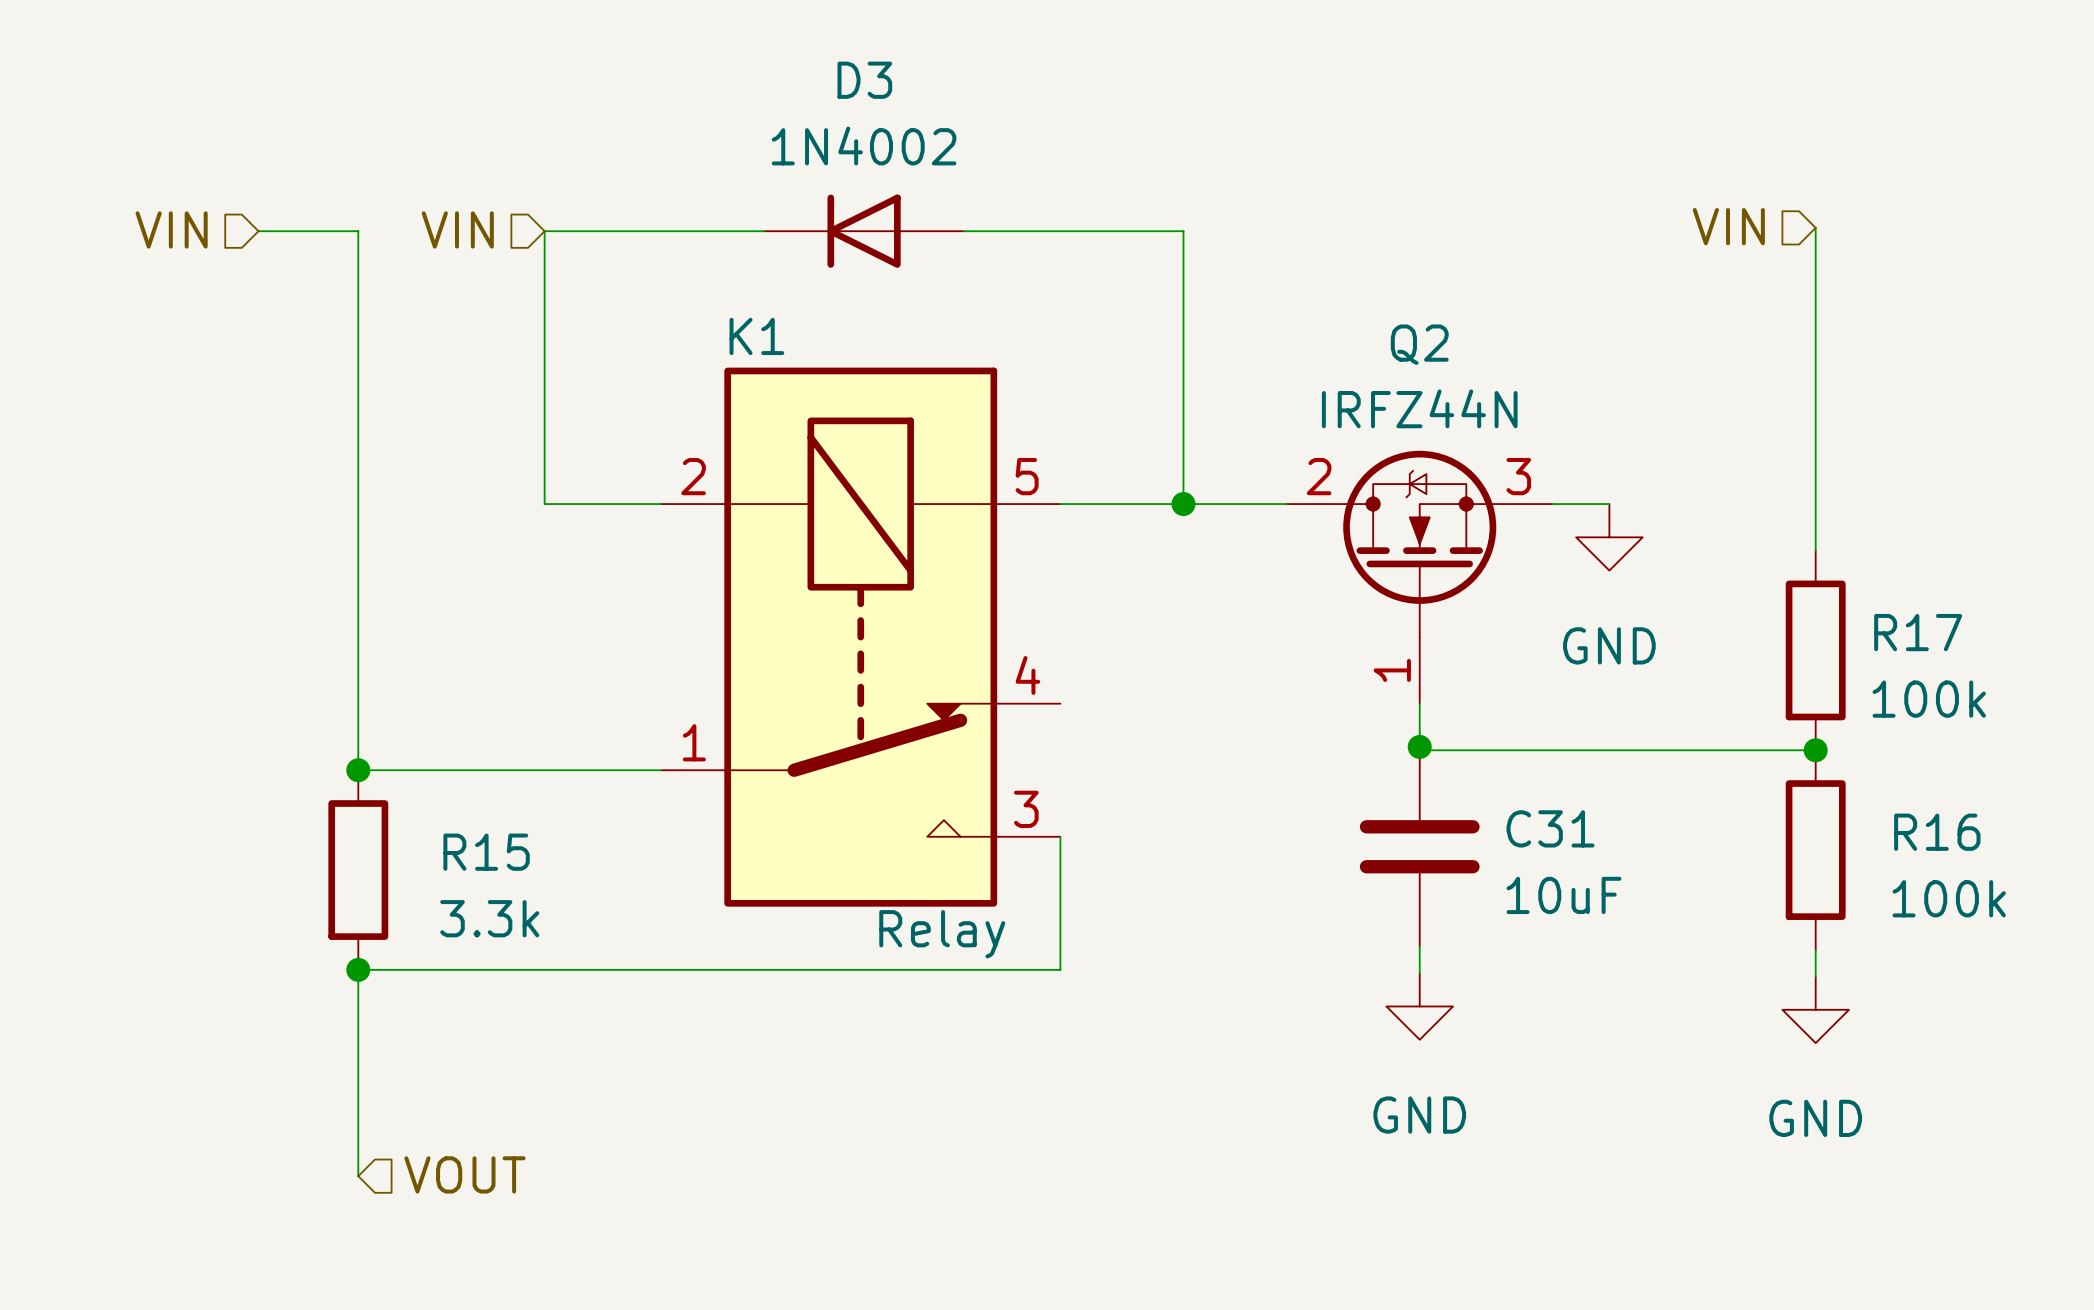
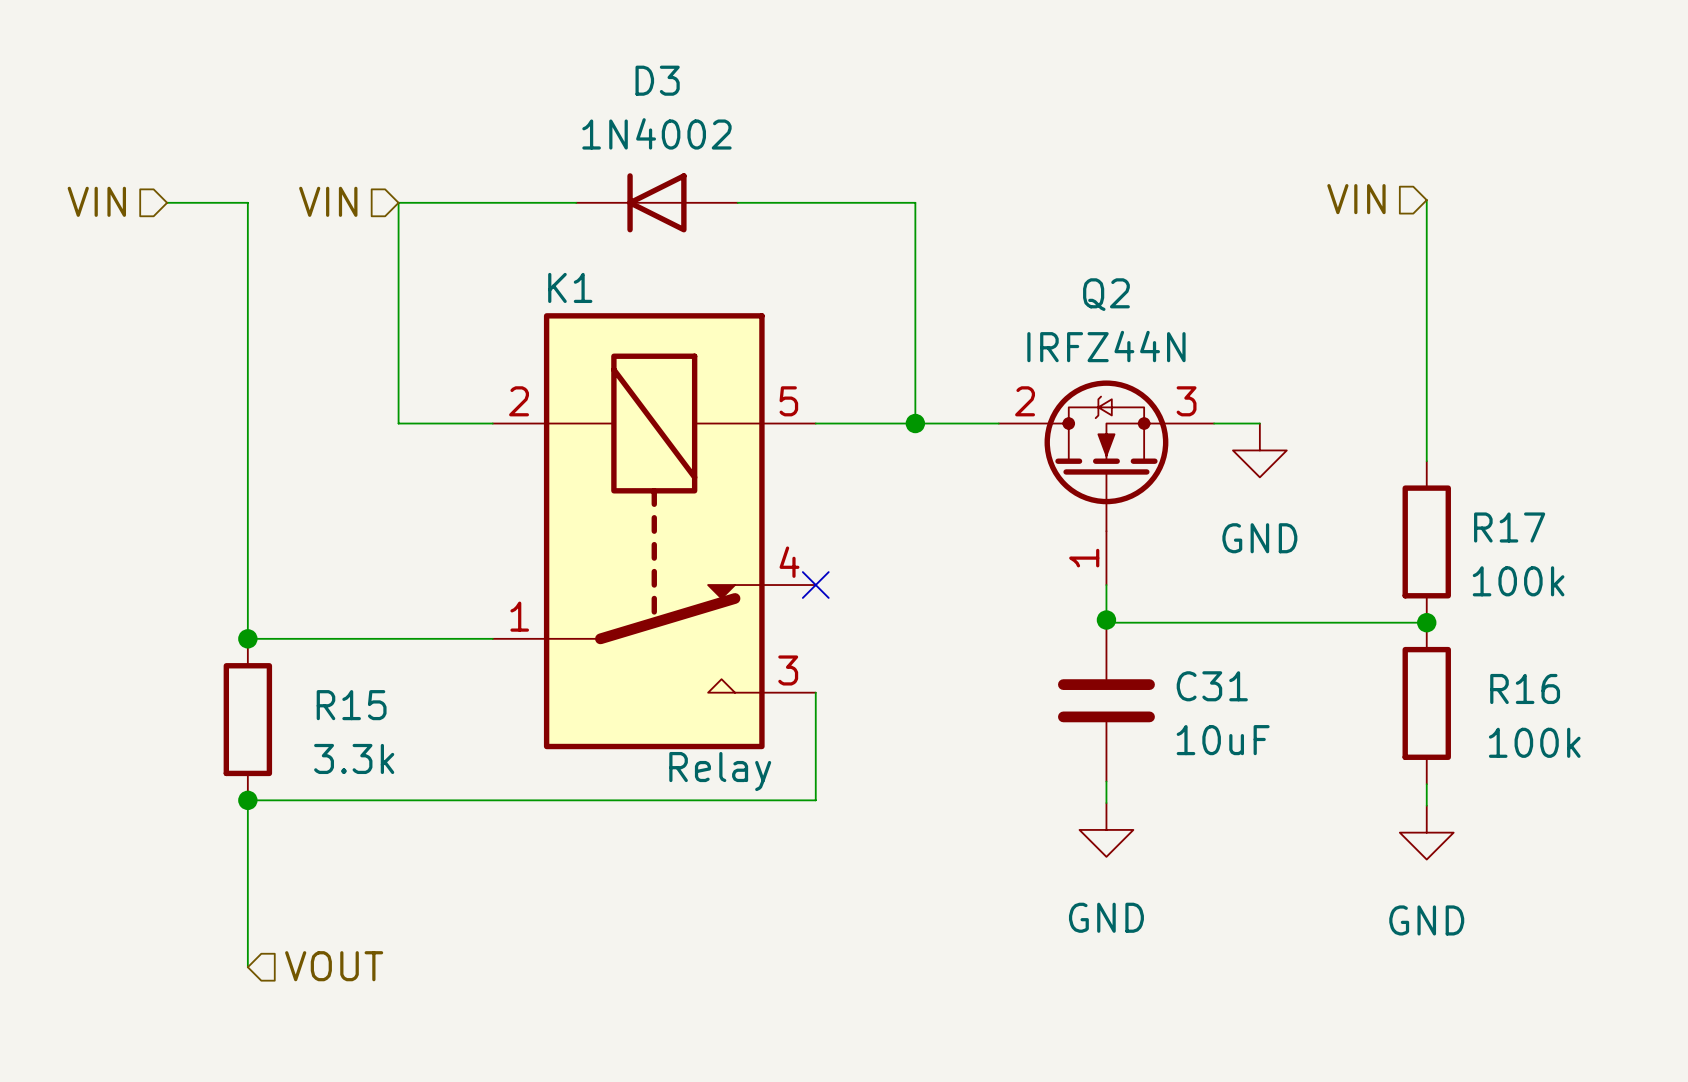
no-connect mark: none -> (815, 585)

